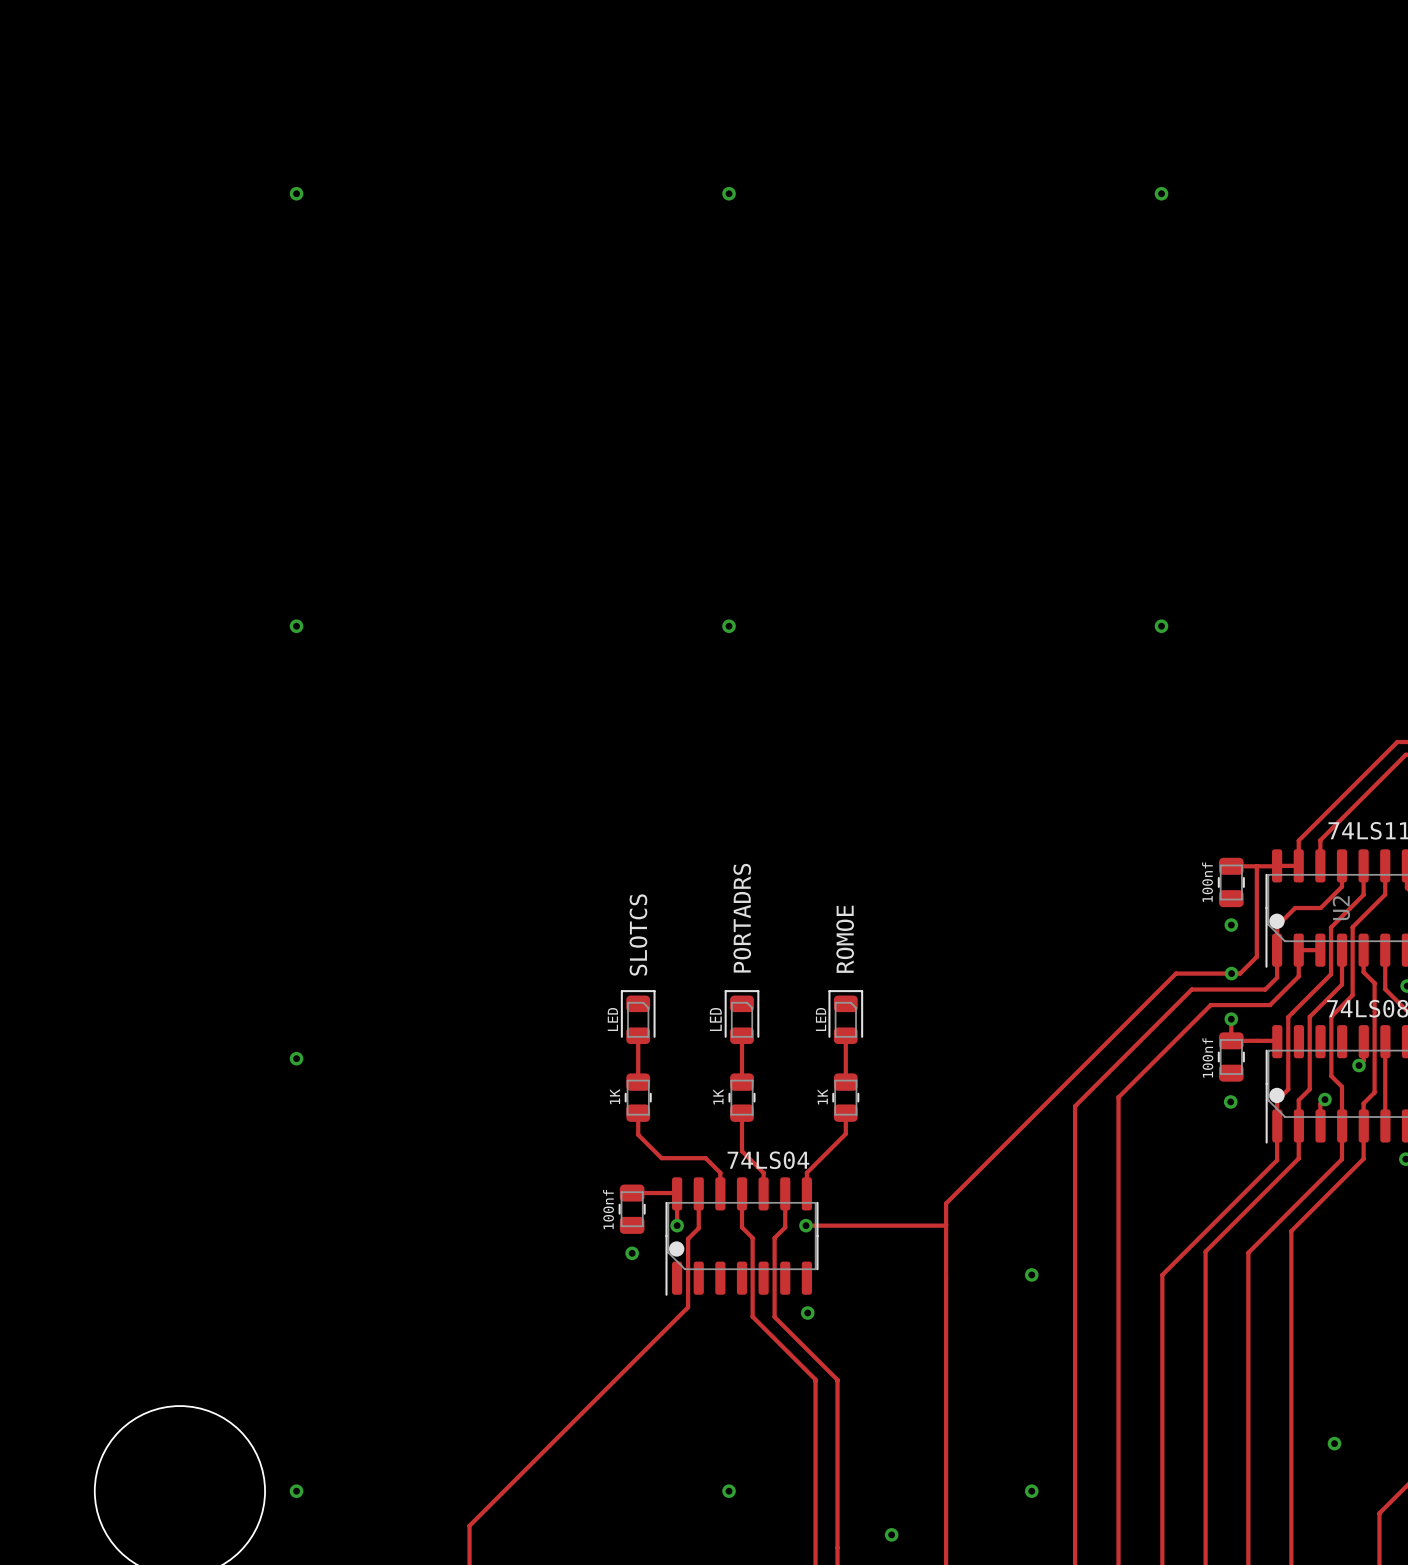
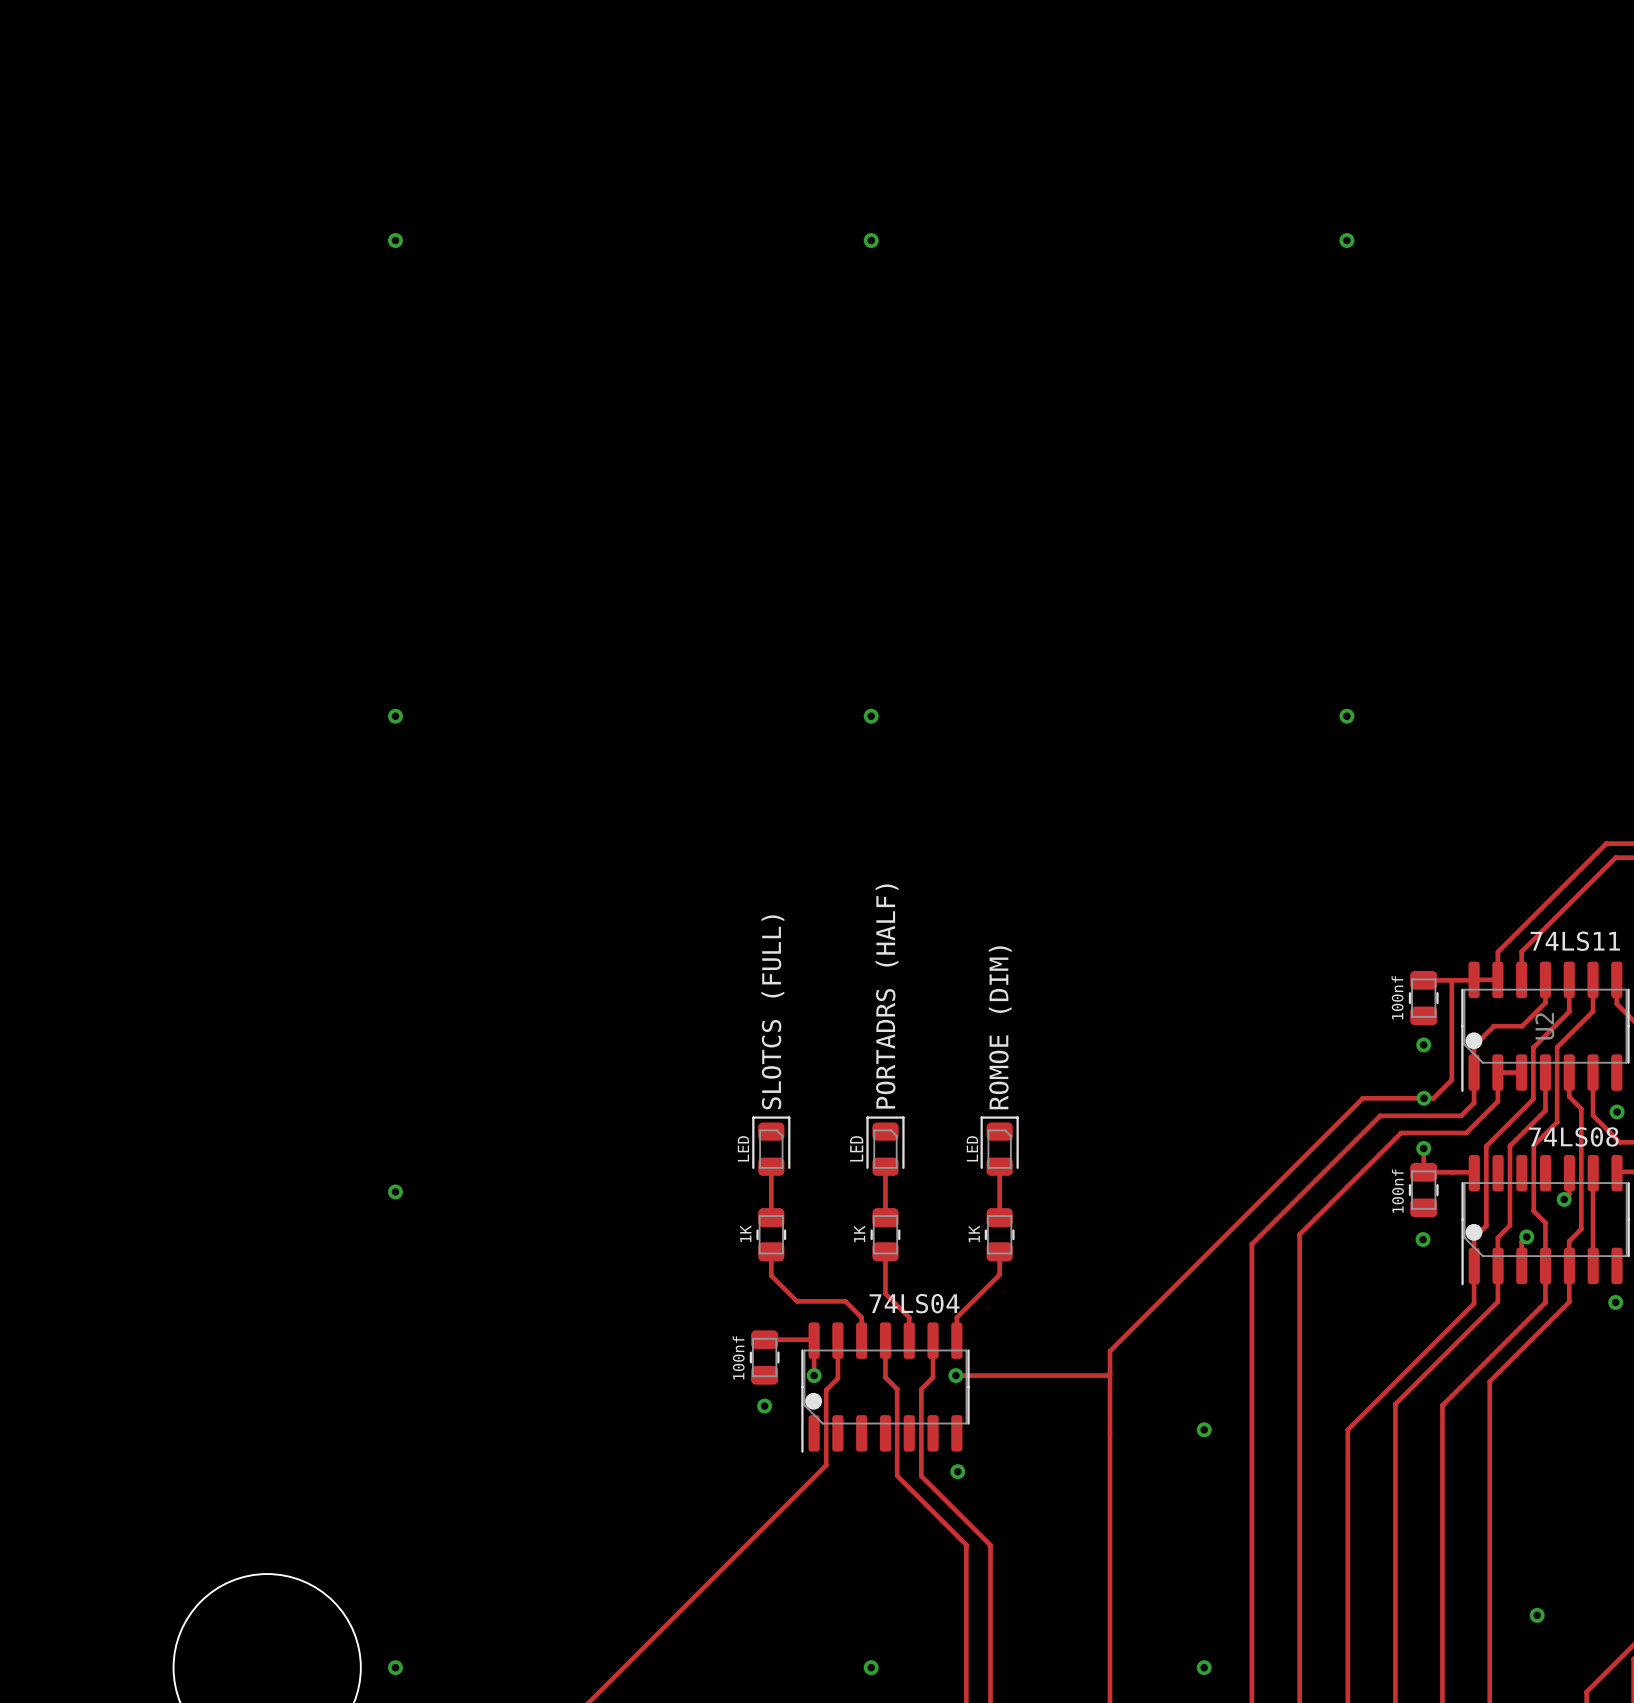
text: PORTADRS (742, 918) -> PORTADRS (HALF) (887, 996)
text: SLOTCS (638, 934) -> SLOTCS (FULL) (772, 1012)
text: ROMOE (845, 939) -> ROMOE (DIM) (1000, 1027)

